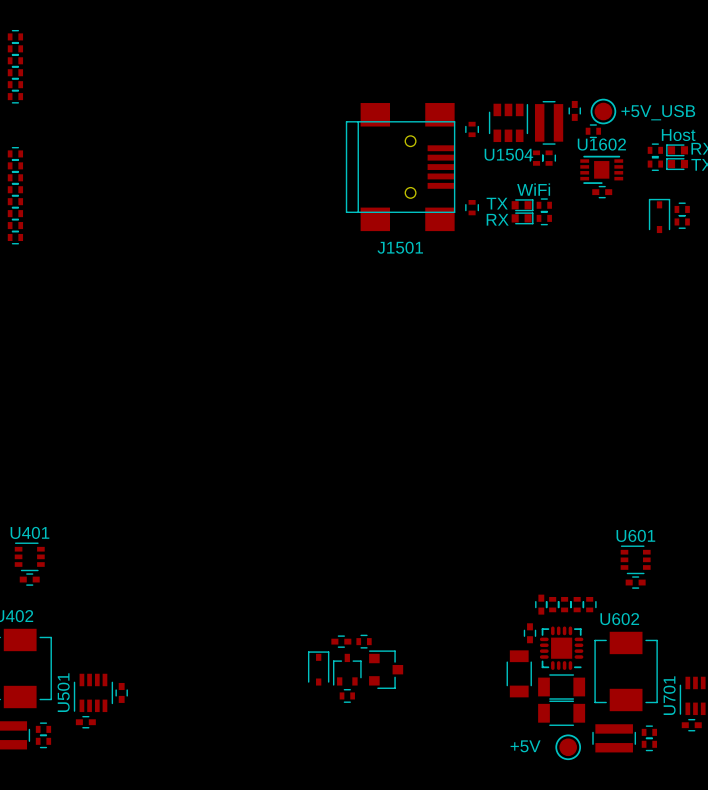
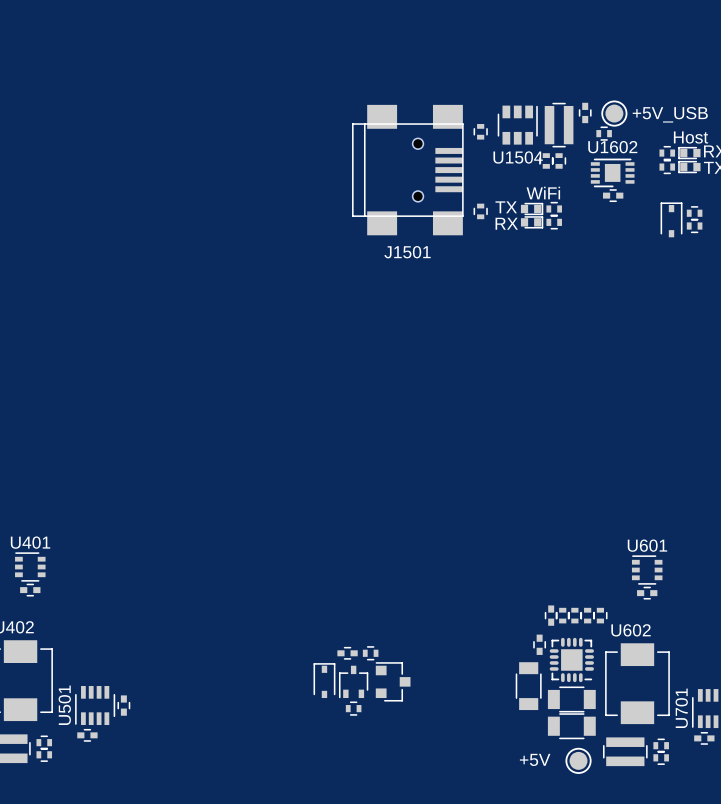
part: (15, 36) -> none
part: (15, 48) -> none
part: (15, 60) -> none
part: (15, 72) -> none
part: (15, 84) -> none
part: (15, 96) -> none
part: (15, 153) -> none
part: (15, 165) -> none
part: (15, 177) -> none
part: (15, 189) -> none
part: (15, 201) -> none
part: (15, 213) -> none
part: (15, 225) -> none
part: (15, 237) -> none

